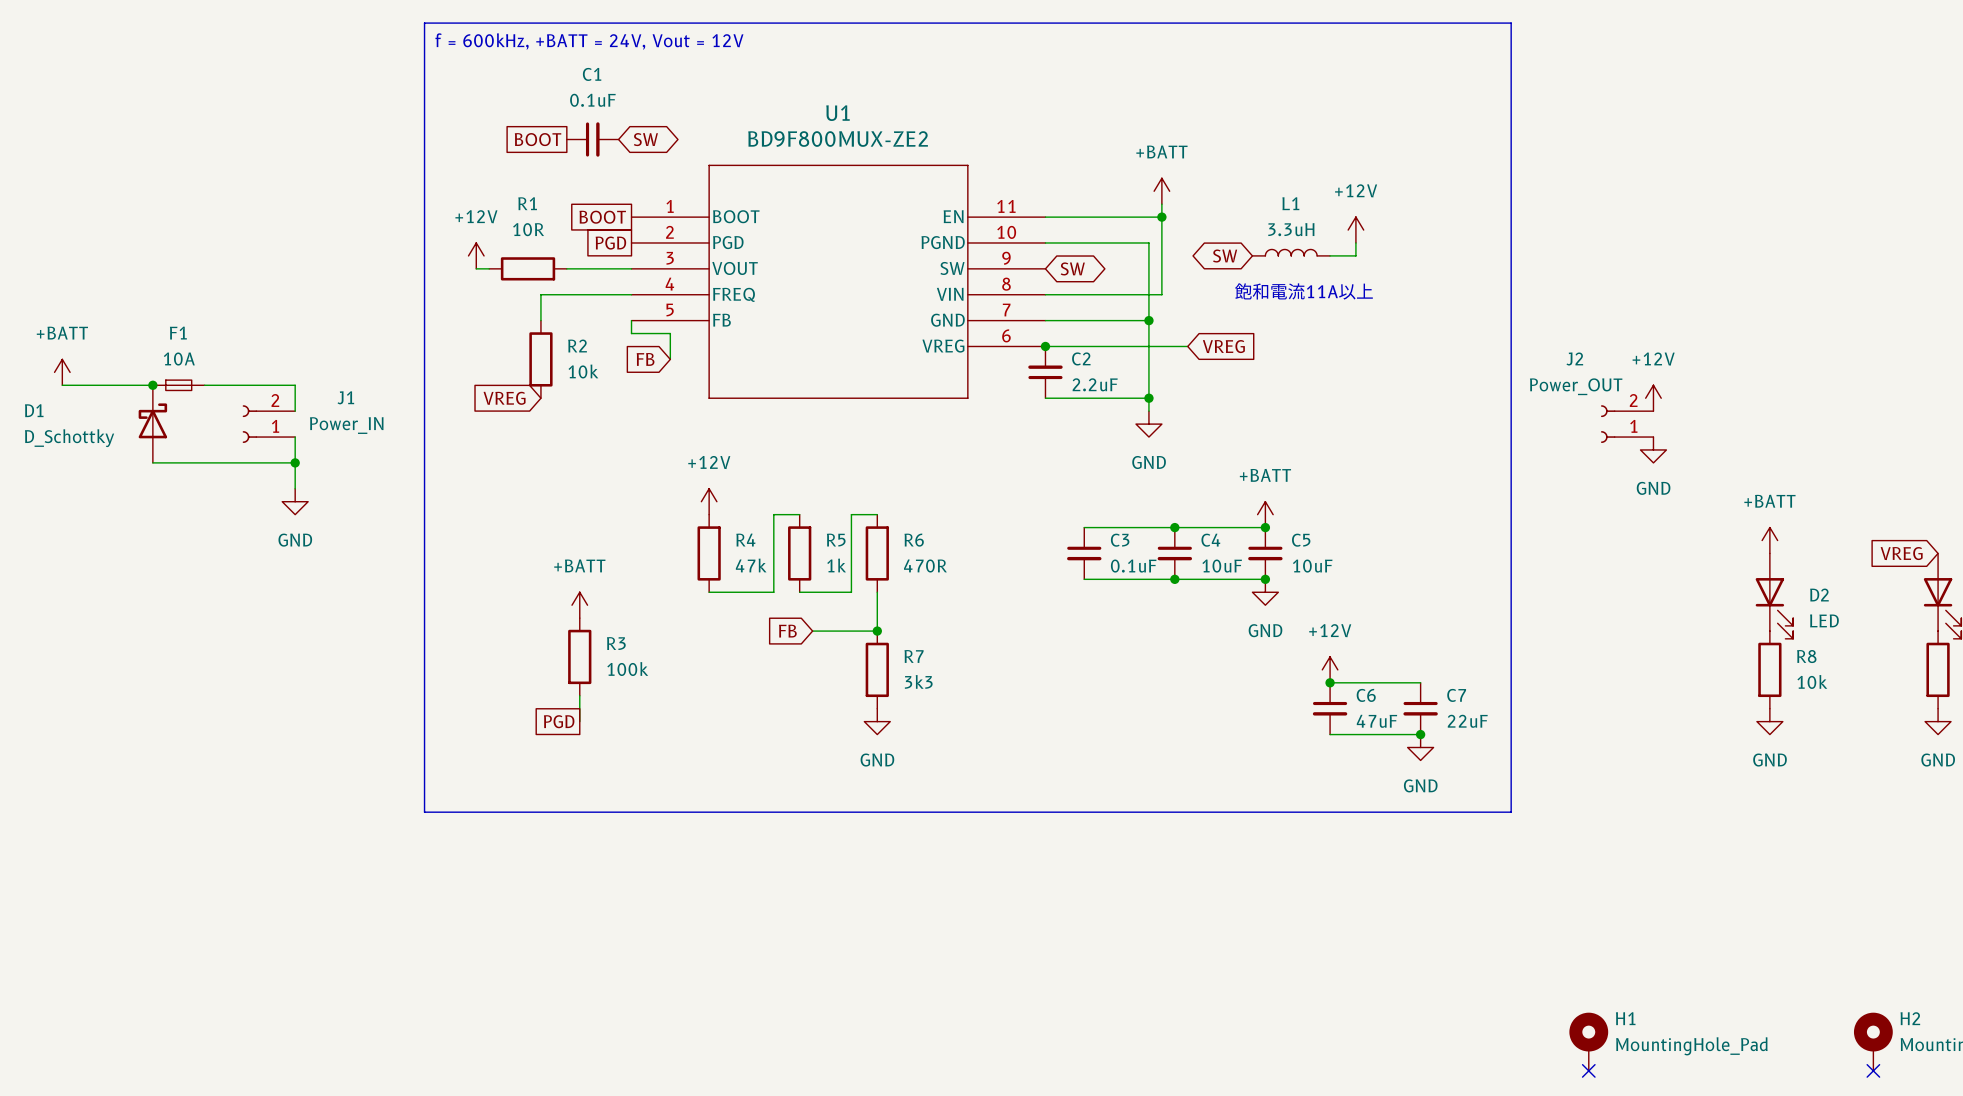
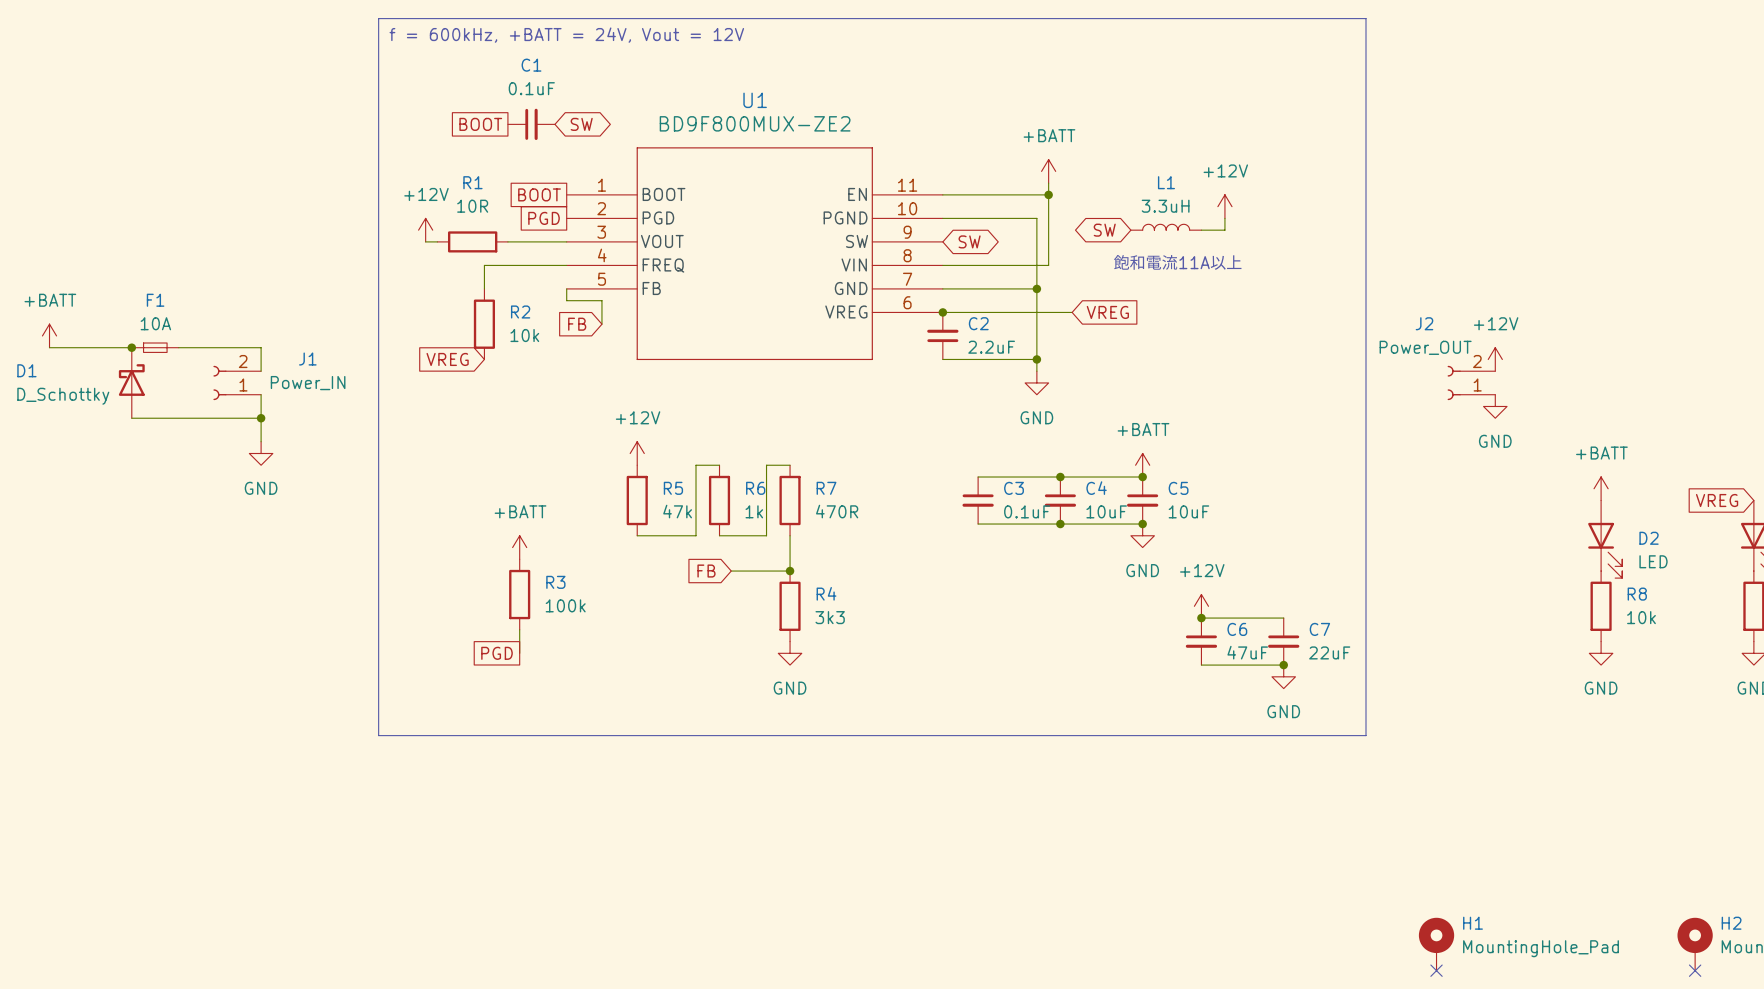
R4 name: R4 (745, 540) -> R5 (673, 488)
R5 name: R5 (836, 540) -> R6 (755, 488)
R6 name: R6 (914, 540) -> R7 (826, 488)
R7 name: R7 (914, 656) -> R4 (826, 593)

